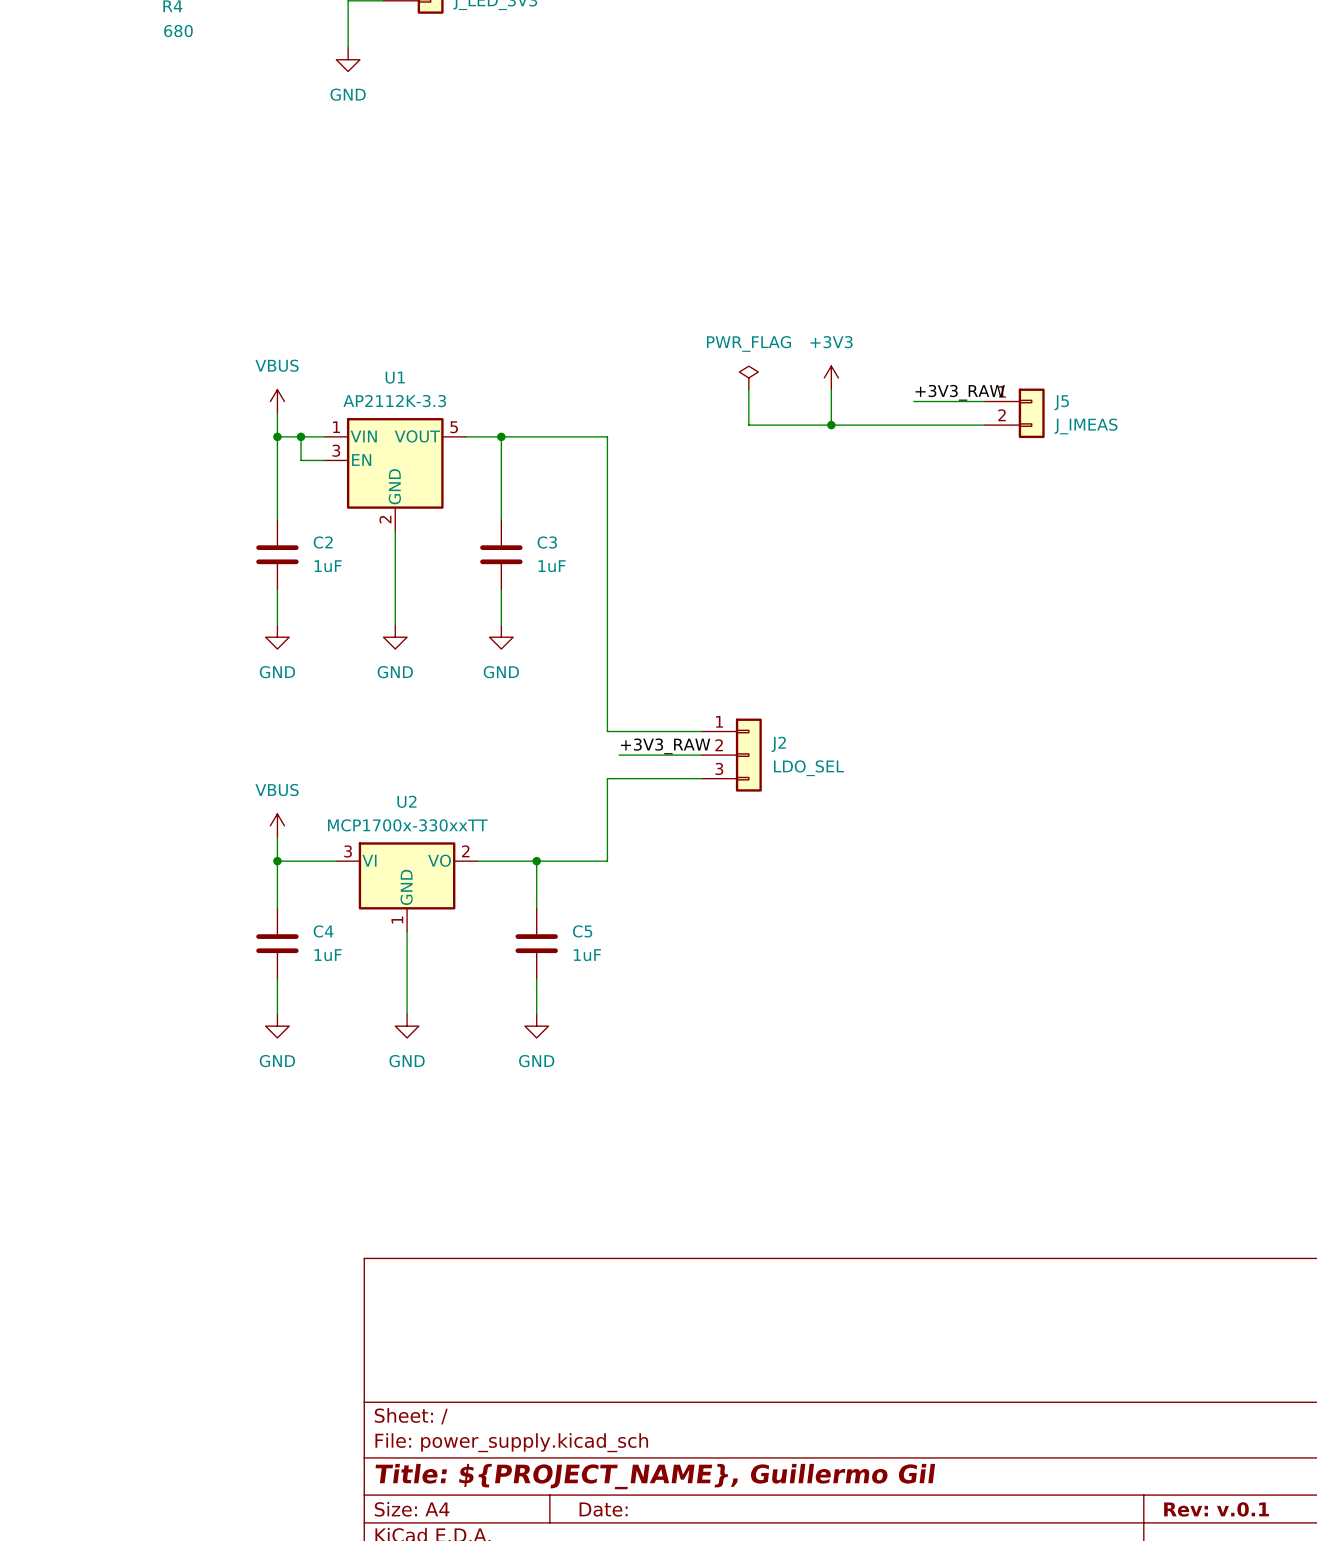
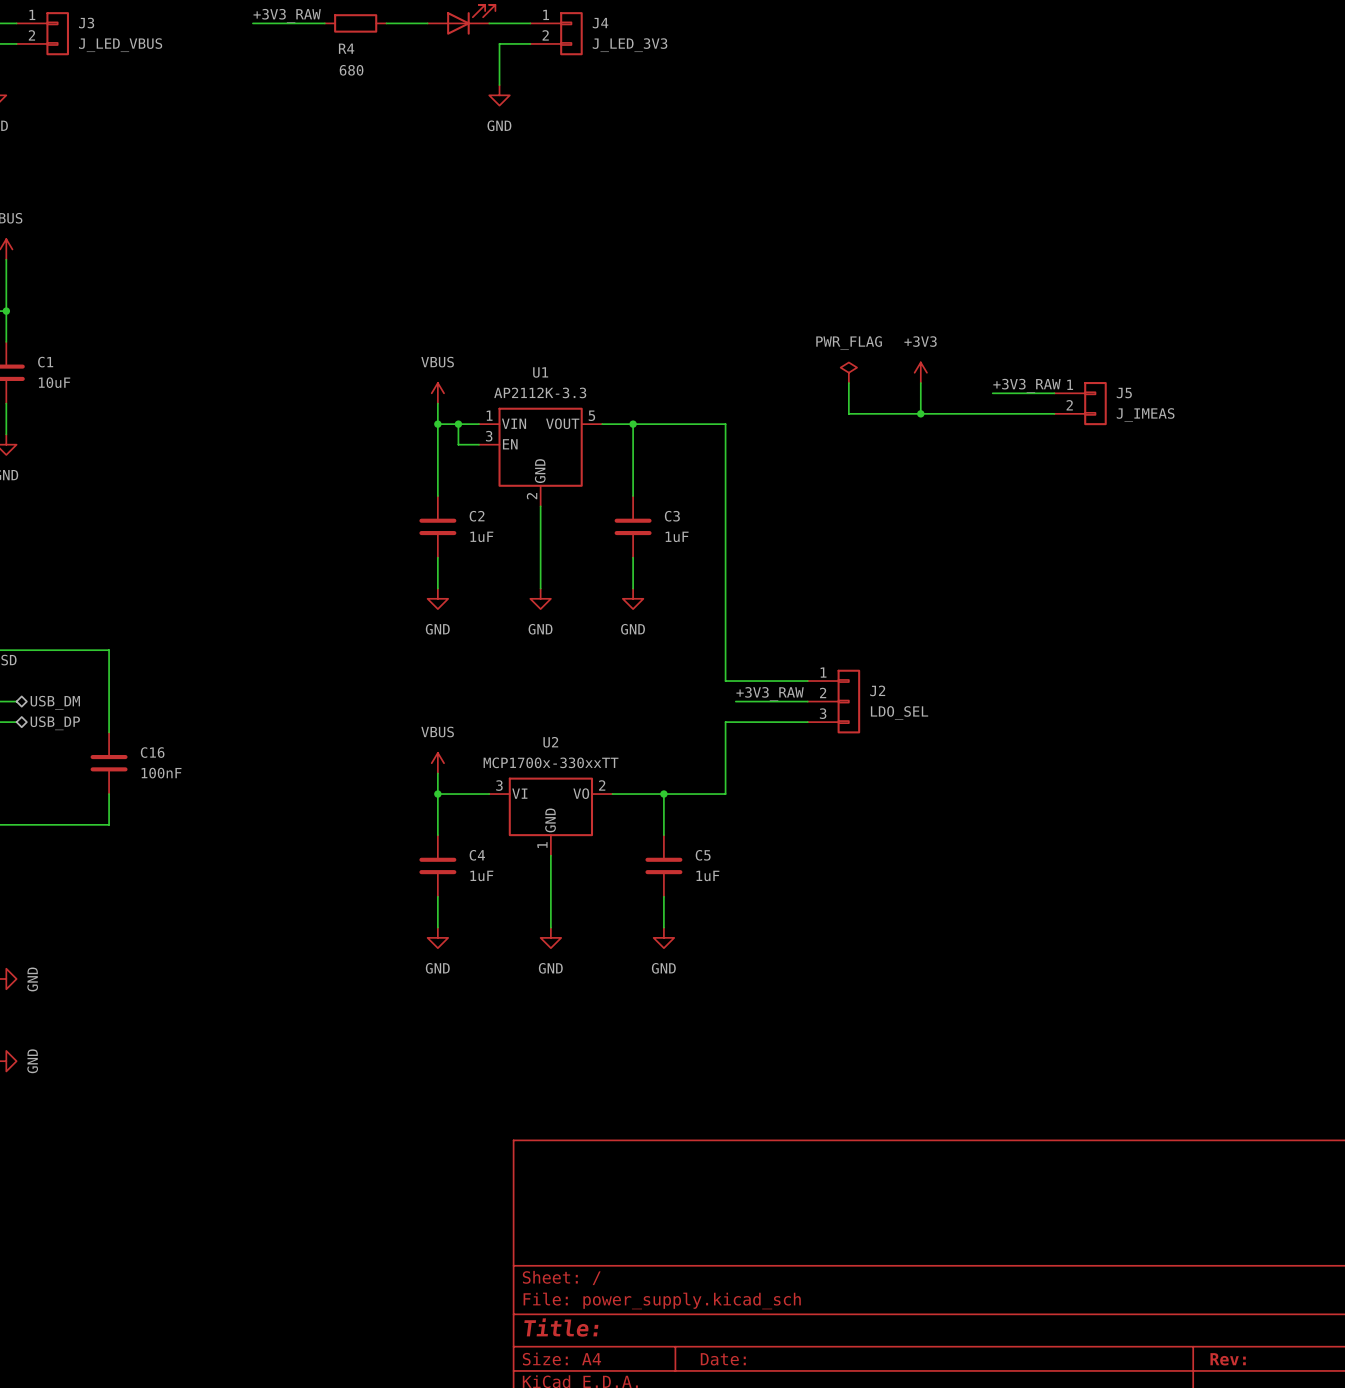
title block: Title: ${PROJECT_NAME}, Guillermo Gil (655, 1476) -> Title: (561, 1327)
title block: Rev: v.0.1 (1216, 1509) -> Rev: (1228, 1359)

